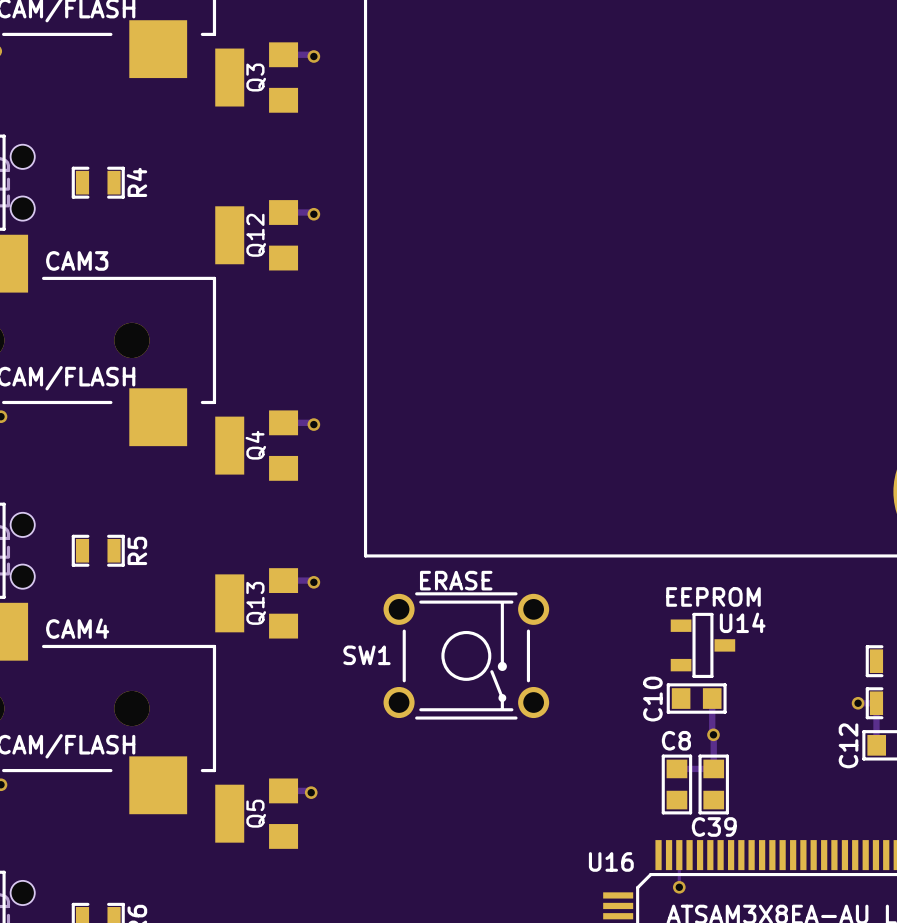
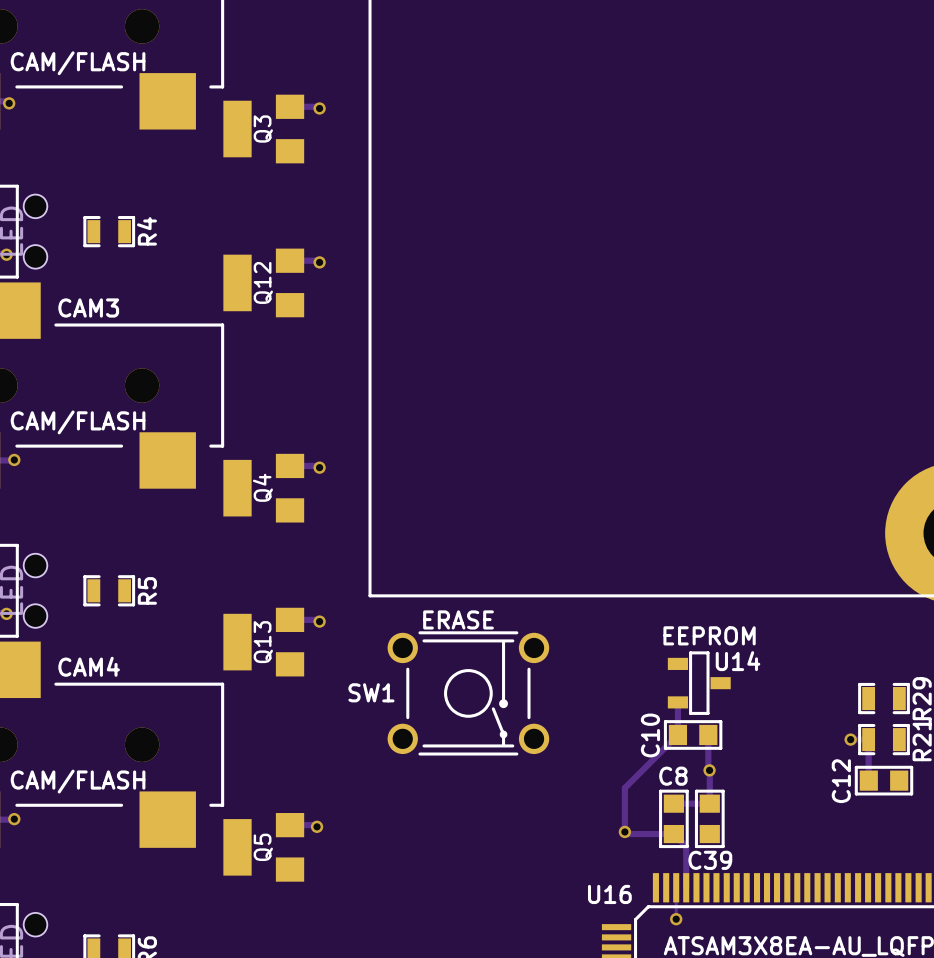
track: none -> (677, 702) (677, 734) (624, 788) (624, 831) (626, 834) (673, 834) (686, 846) (686, 887)
via: none -> (624, 831)

